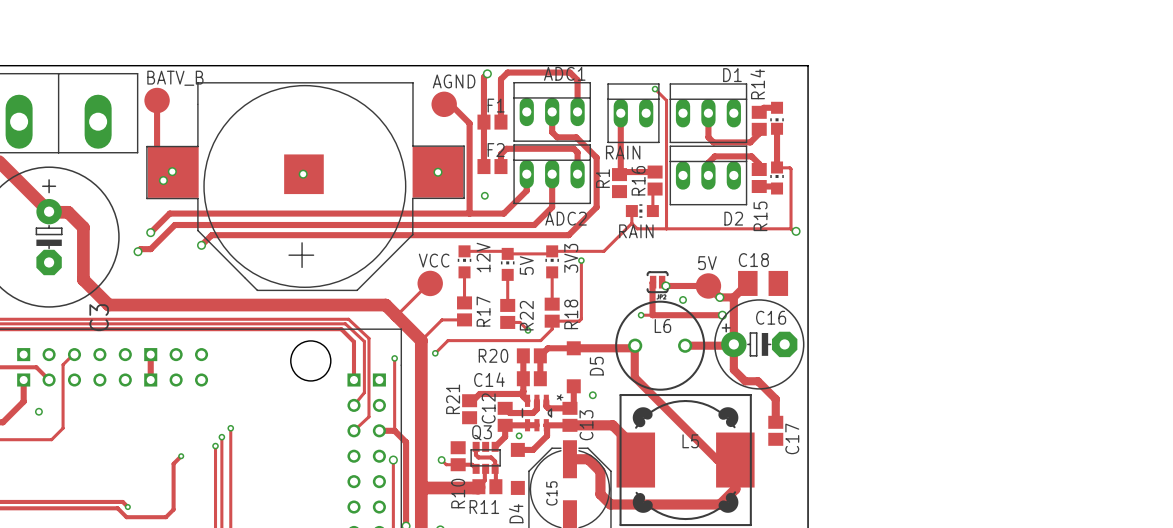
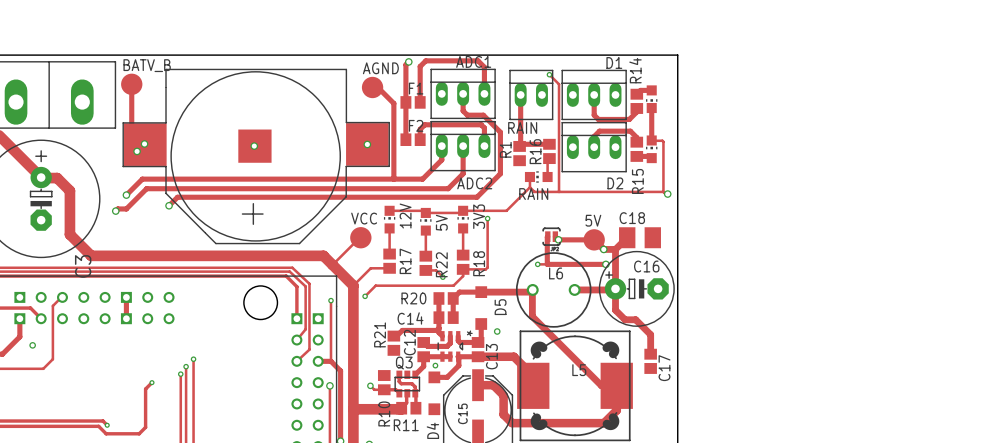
via: (484, 195) -> none
via: (683, 299) -> none

